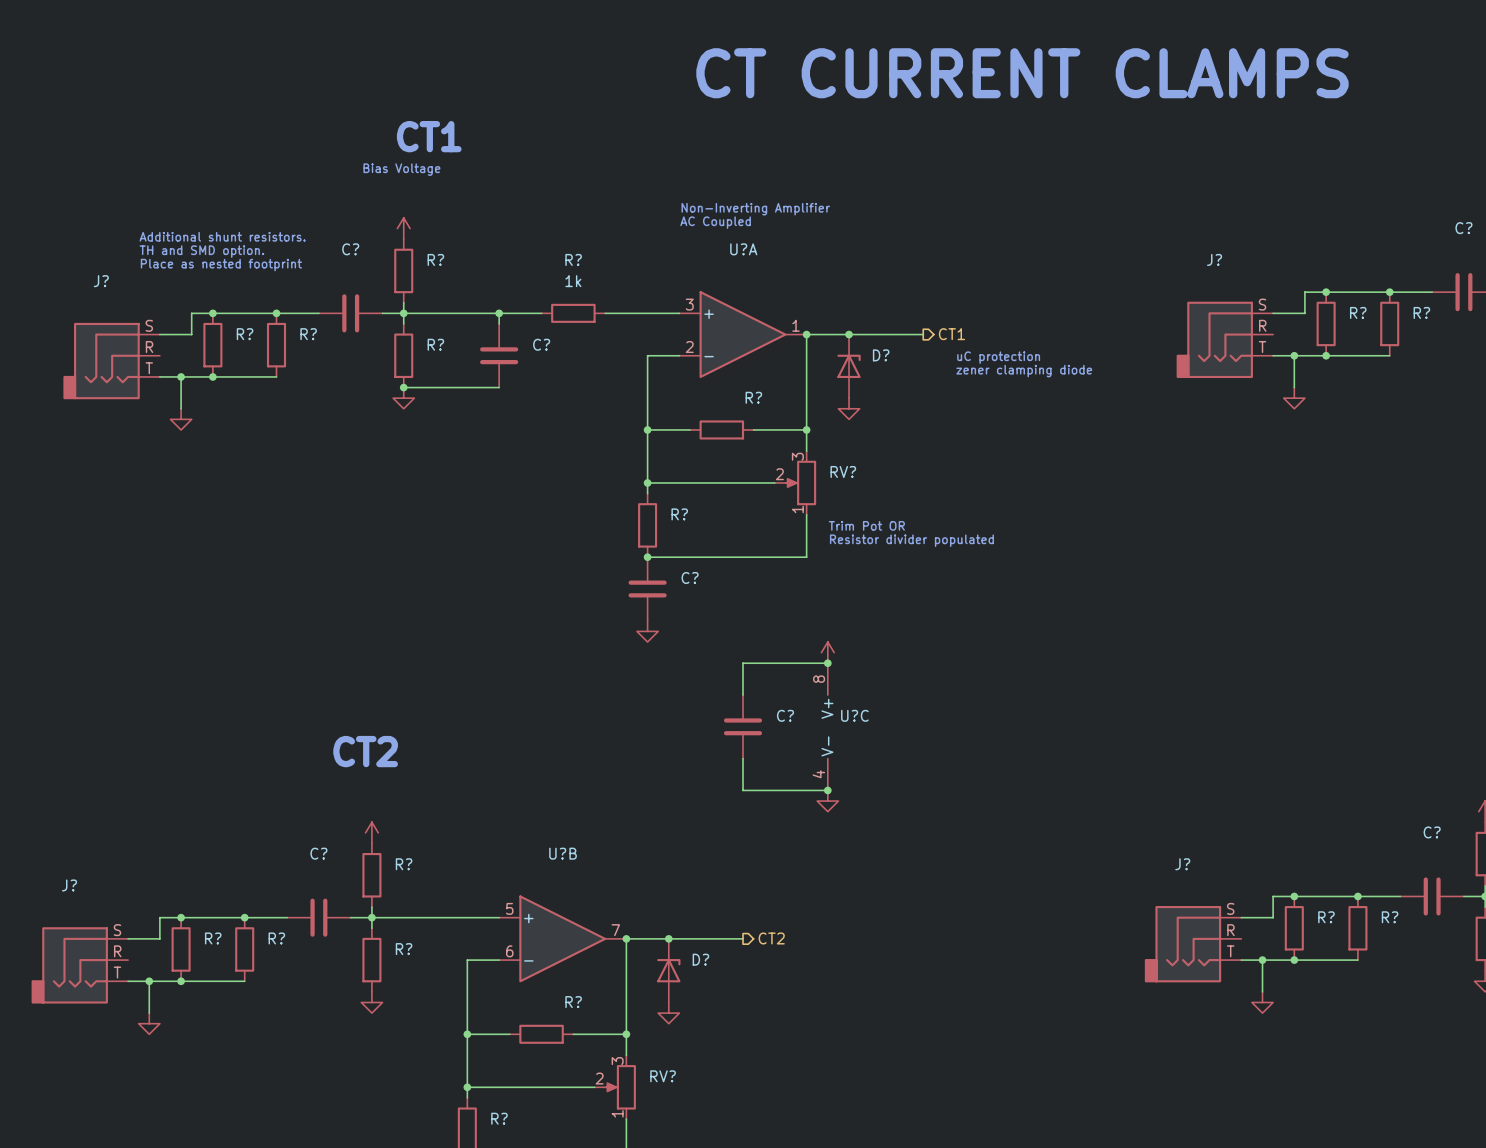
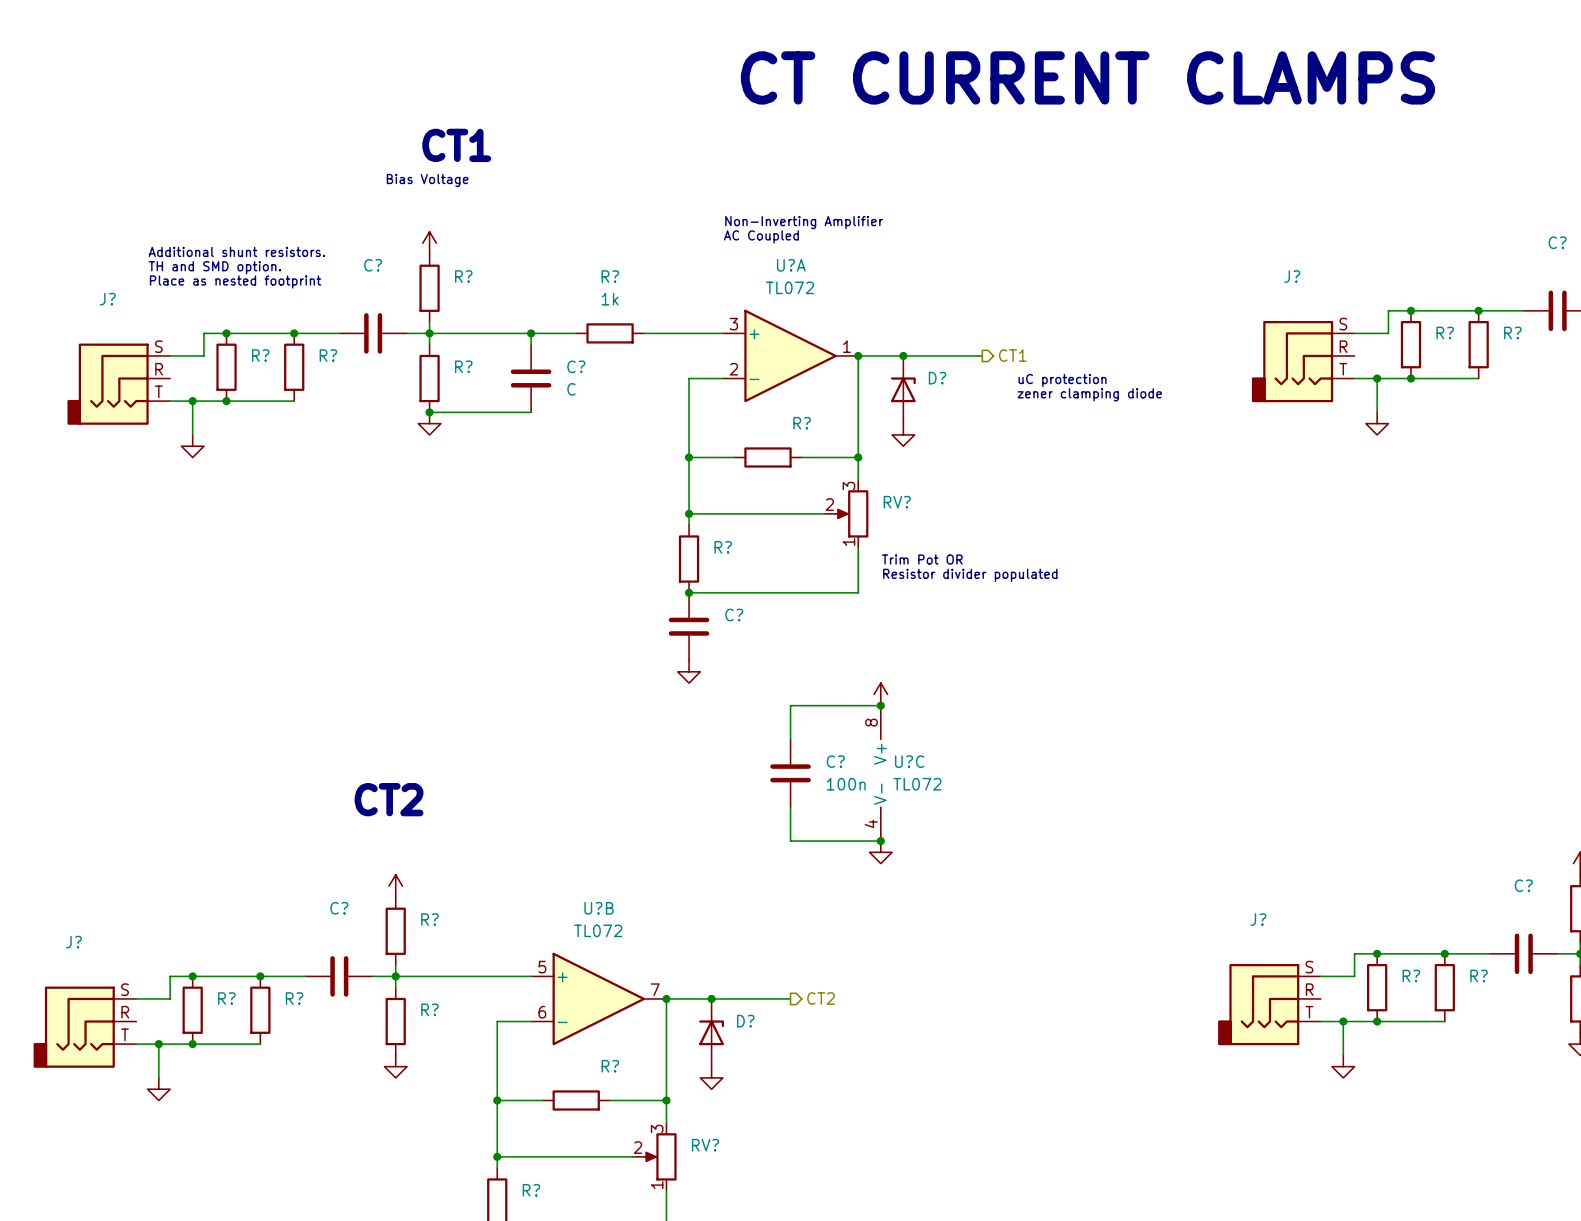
U?A value: none -> TL072 (790, 287)
C? value: none -> C (571, 389)
C? value: none -> 100n (846, 784)
U?C value: none -> TL072 (917, 784)
U?B value: none -> TL072 (598, 930)

